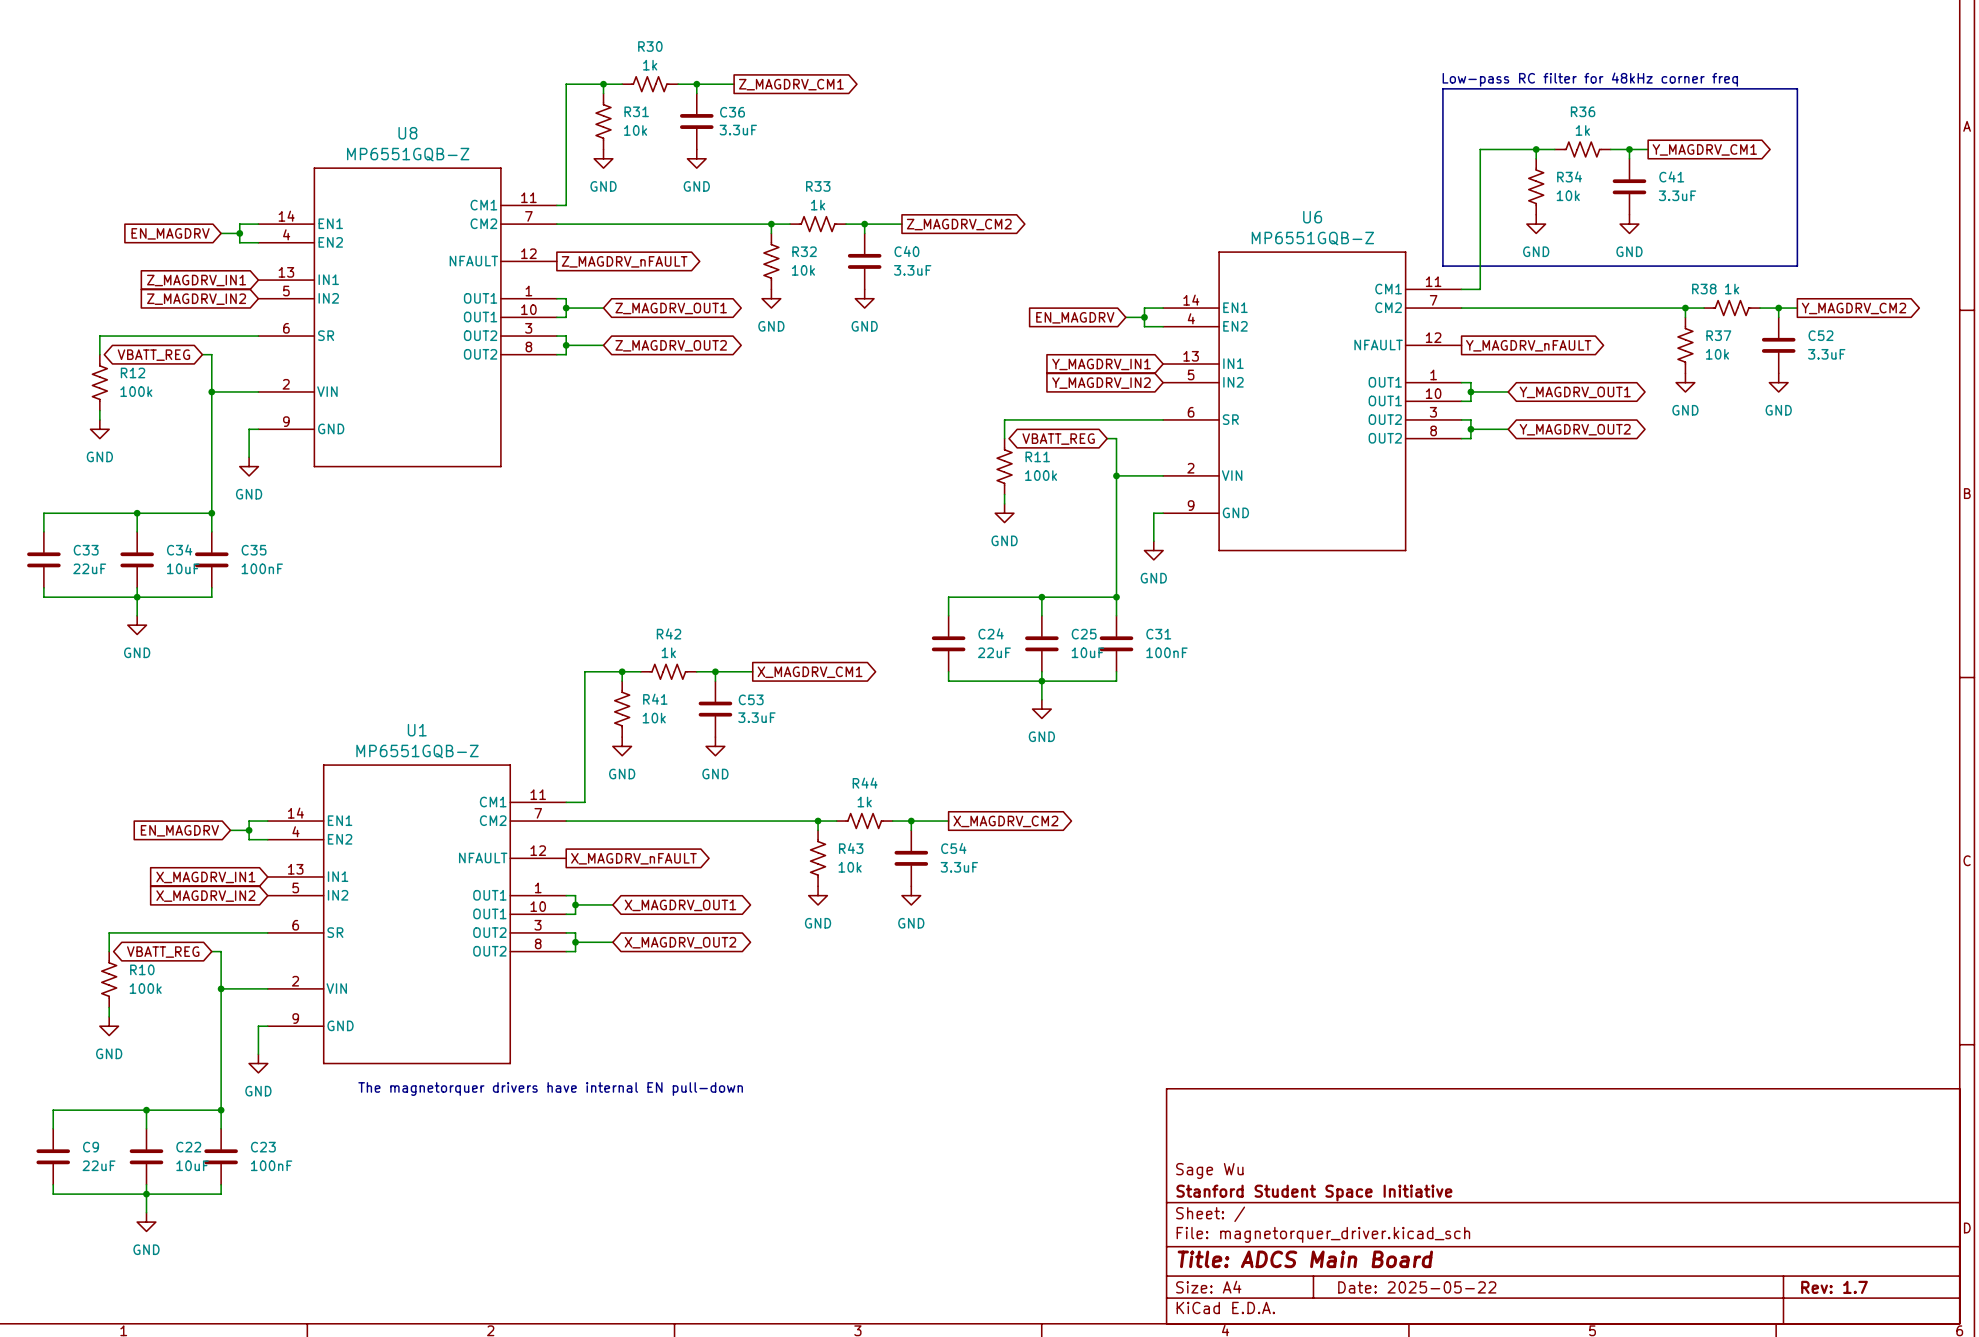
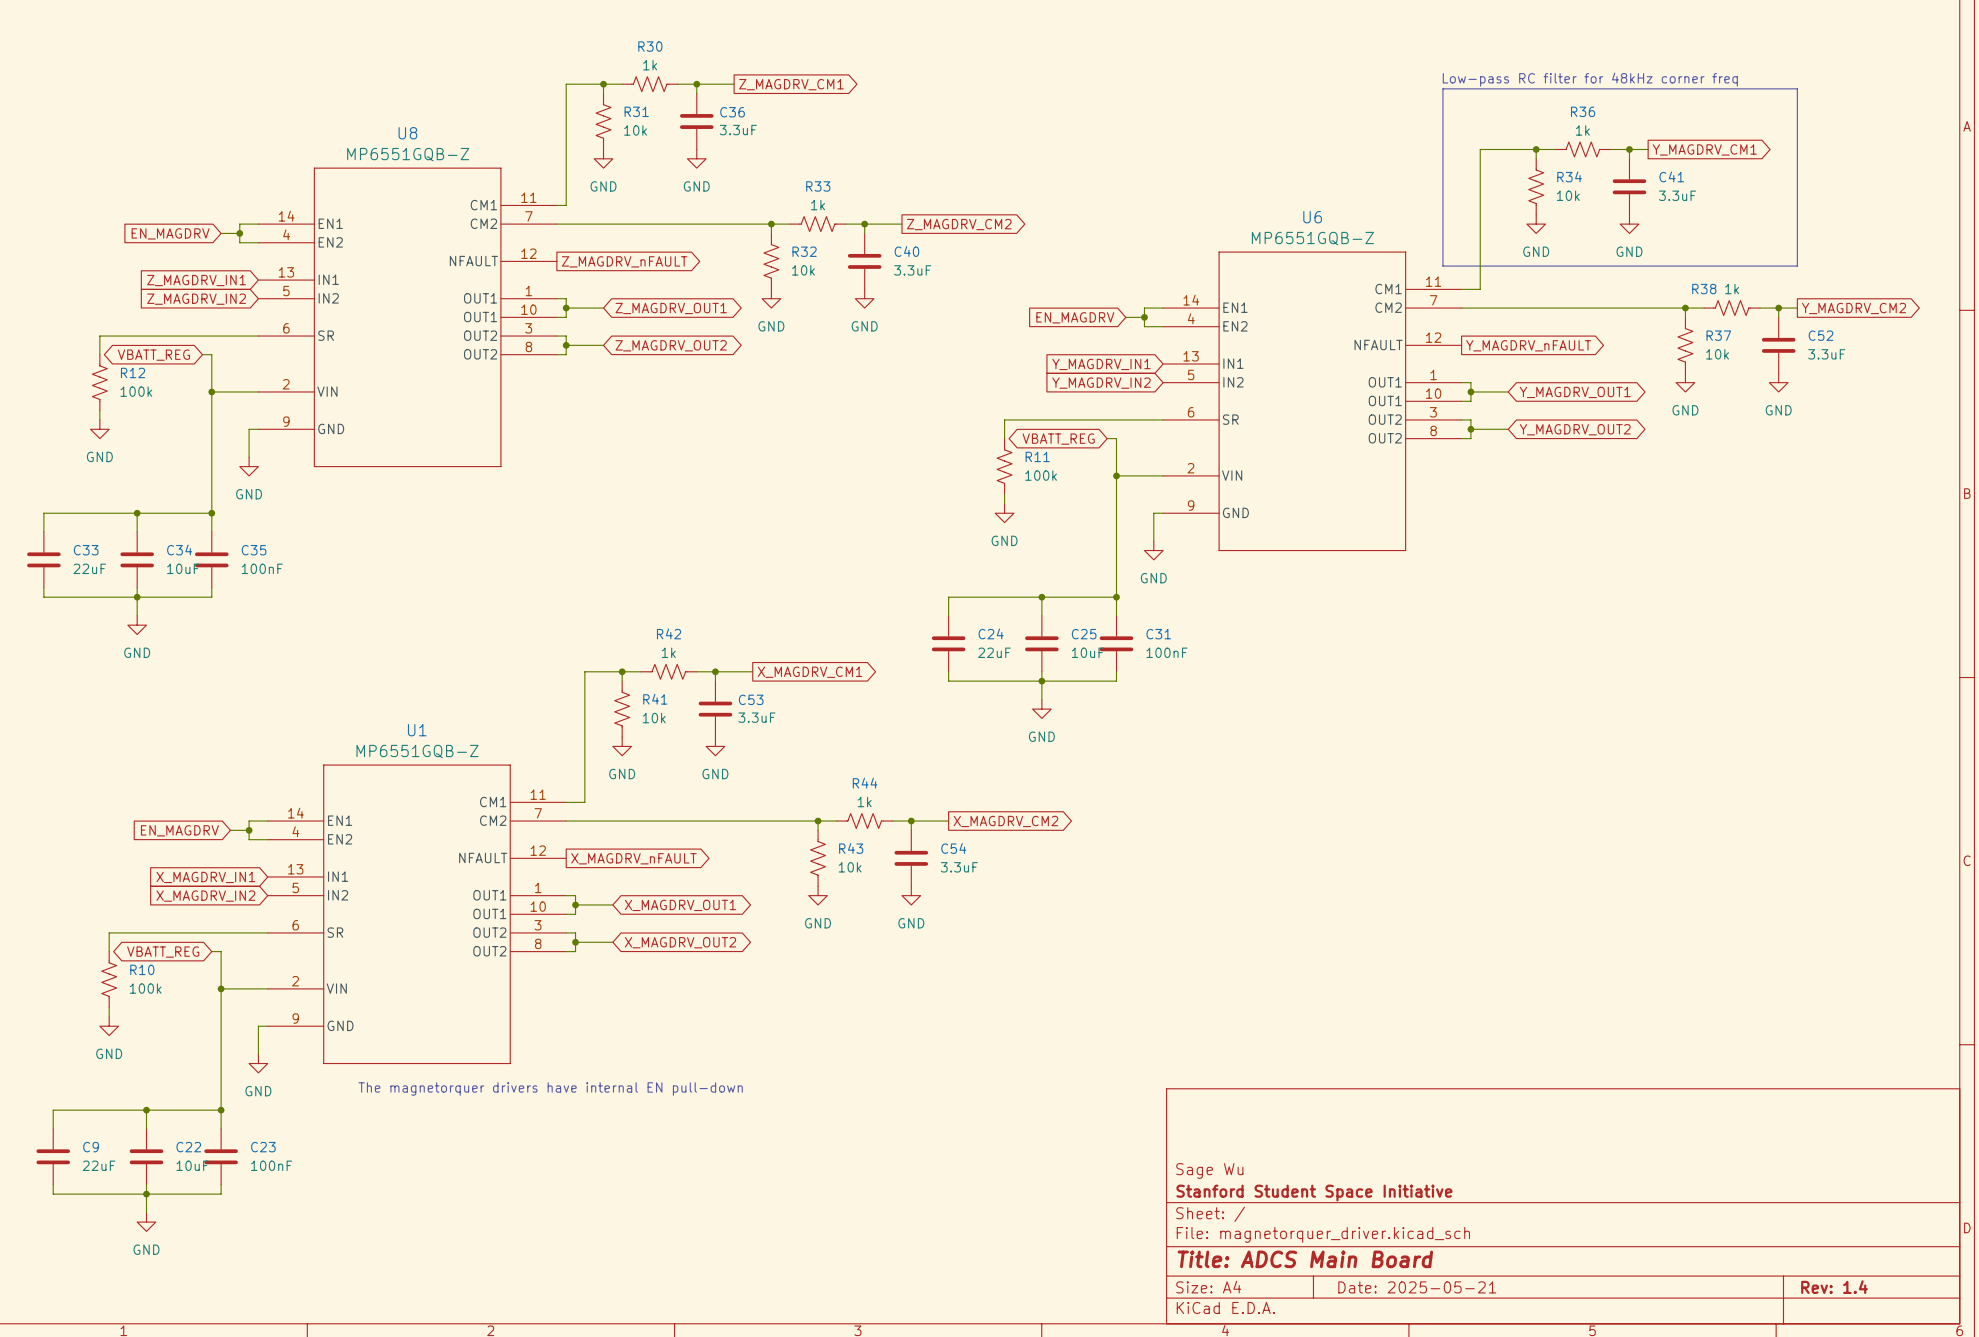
title block: Date: 2025-05-22 (1417, 1287) -> Date: 2025-05-21 (1417, 1287)
title block: Rev: 1.7 (1834, 1287) -> Rev: 1.4 (1834, 1287)

